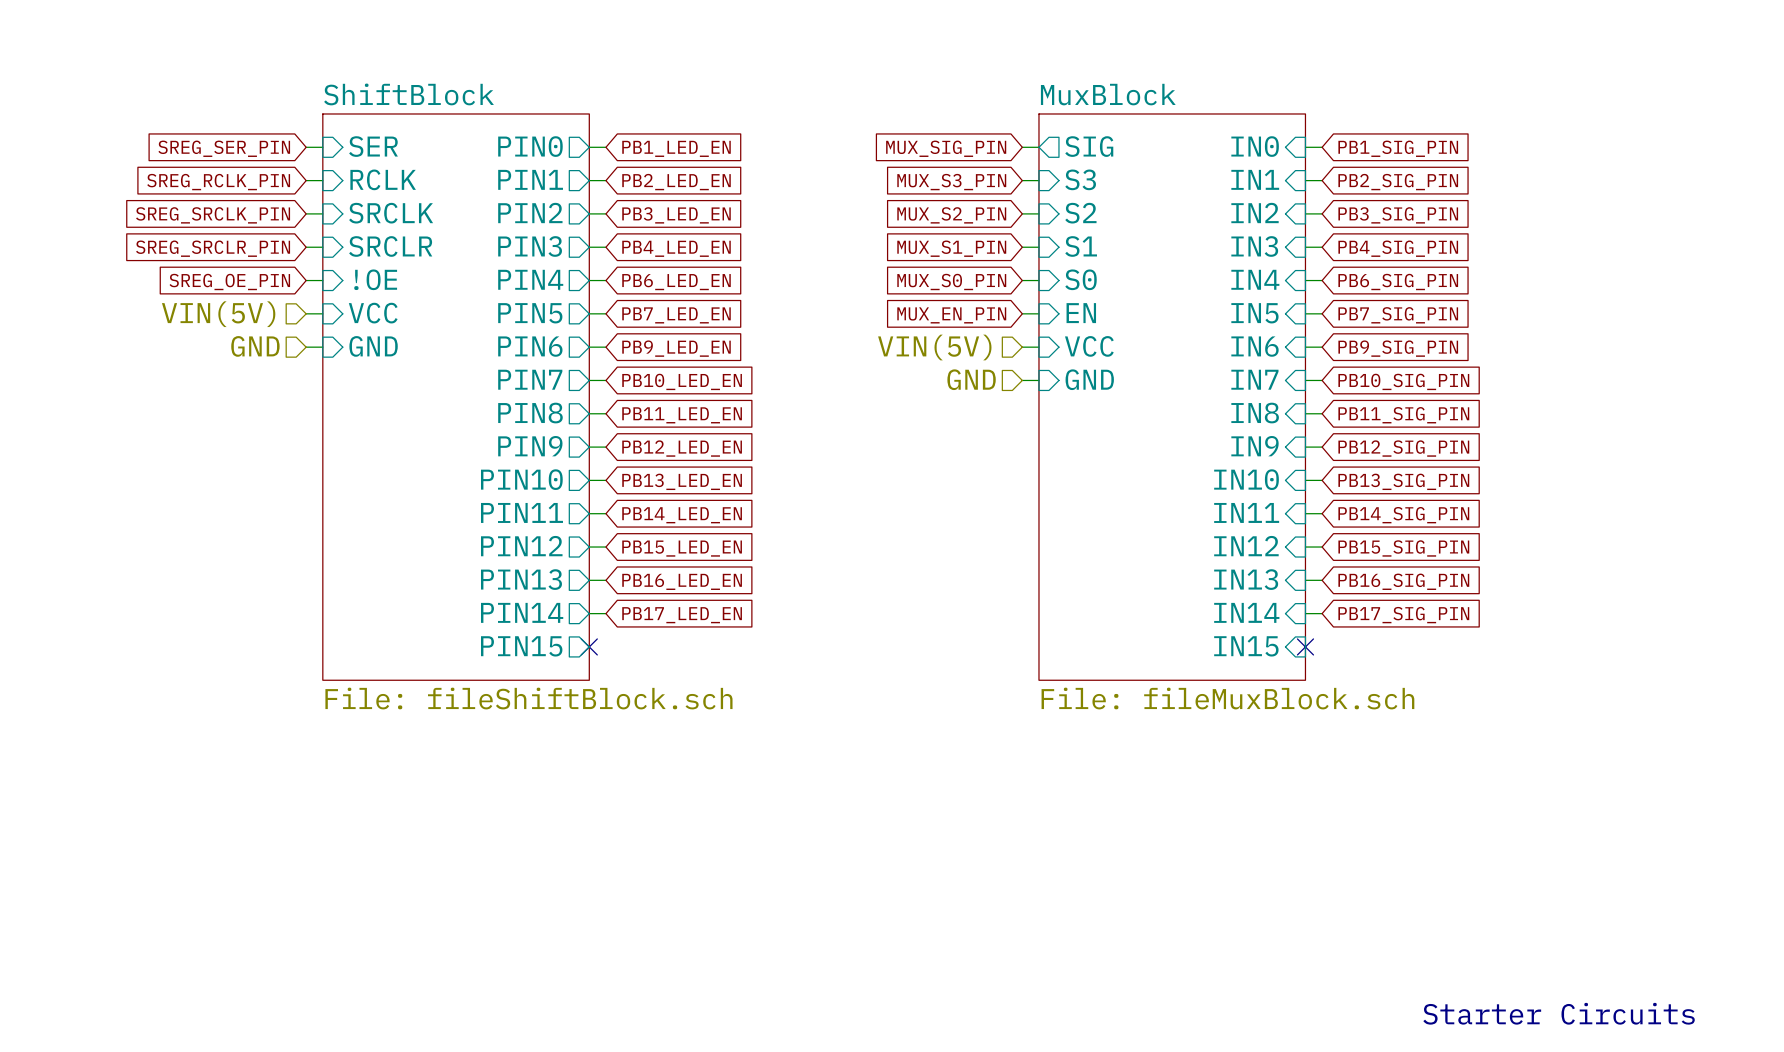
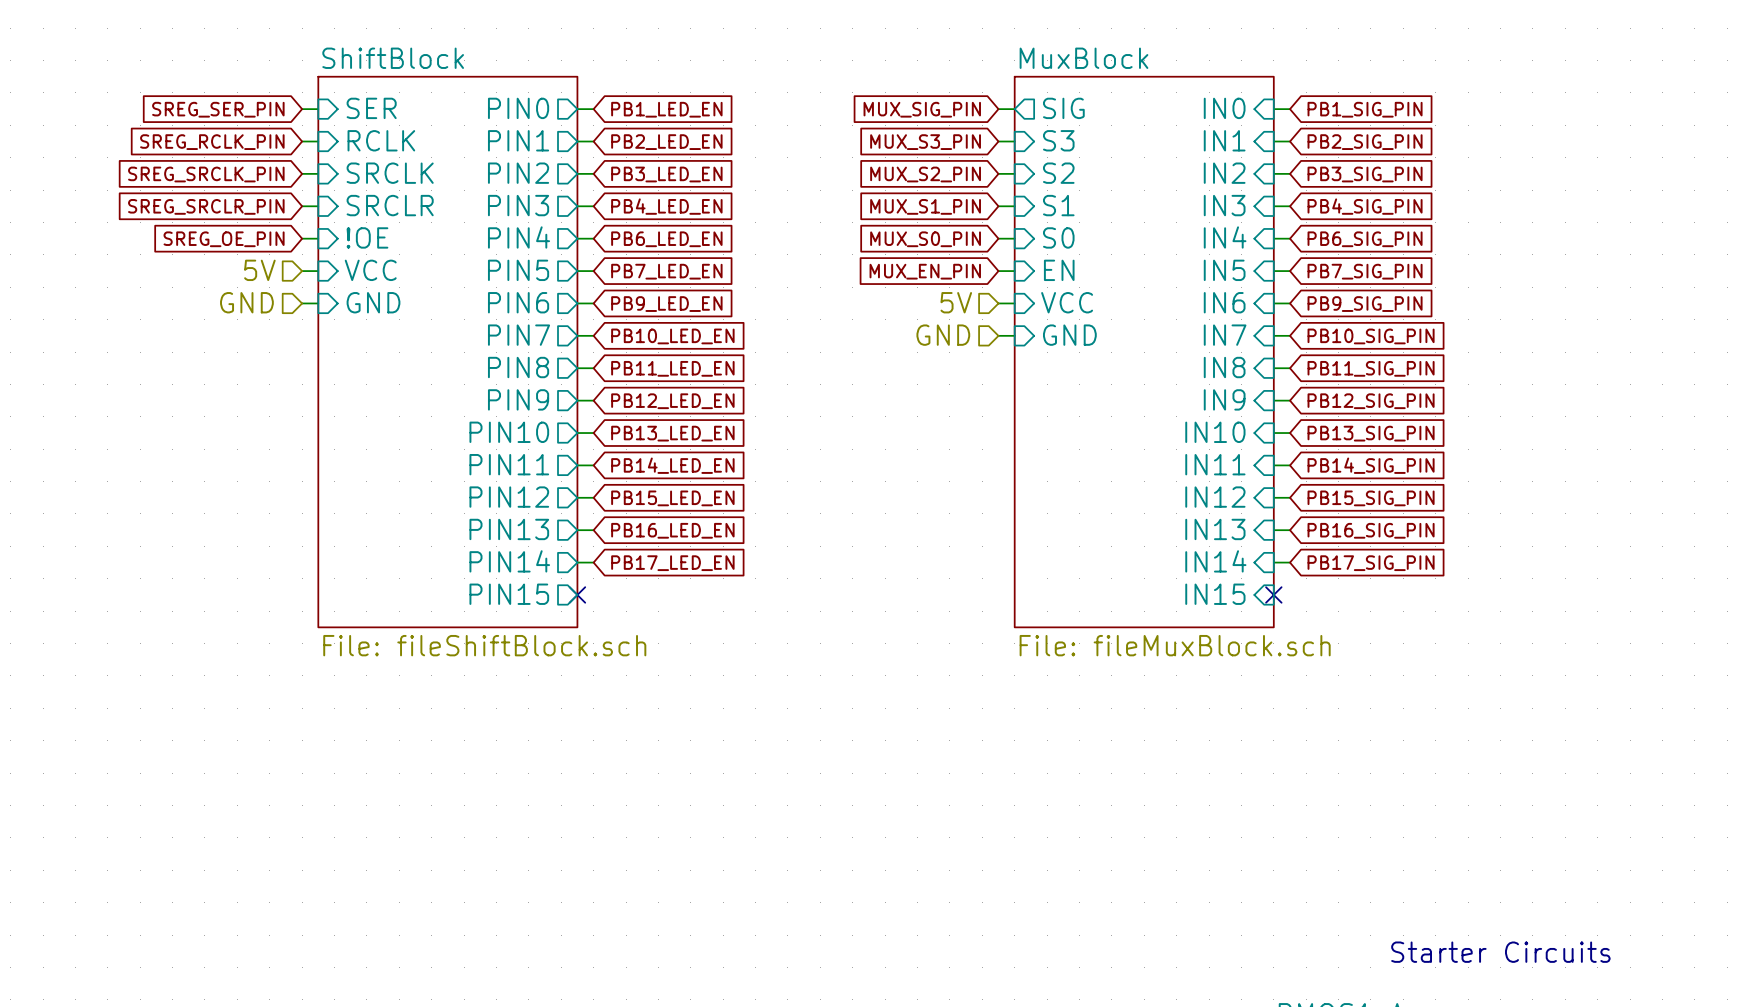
hierarchical label: VIN(5V) (218, 314) -> 5V (259, 270)
hierarchical label: VIN(5V) (934, 347) -> 5V (956, 302)

